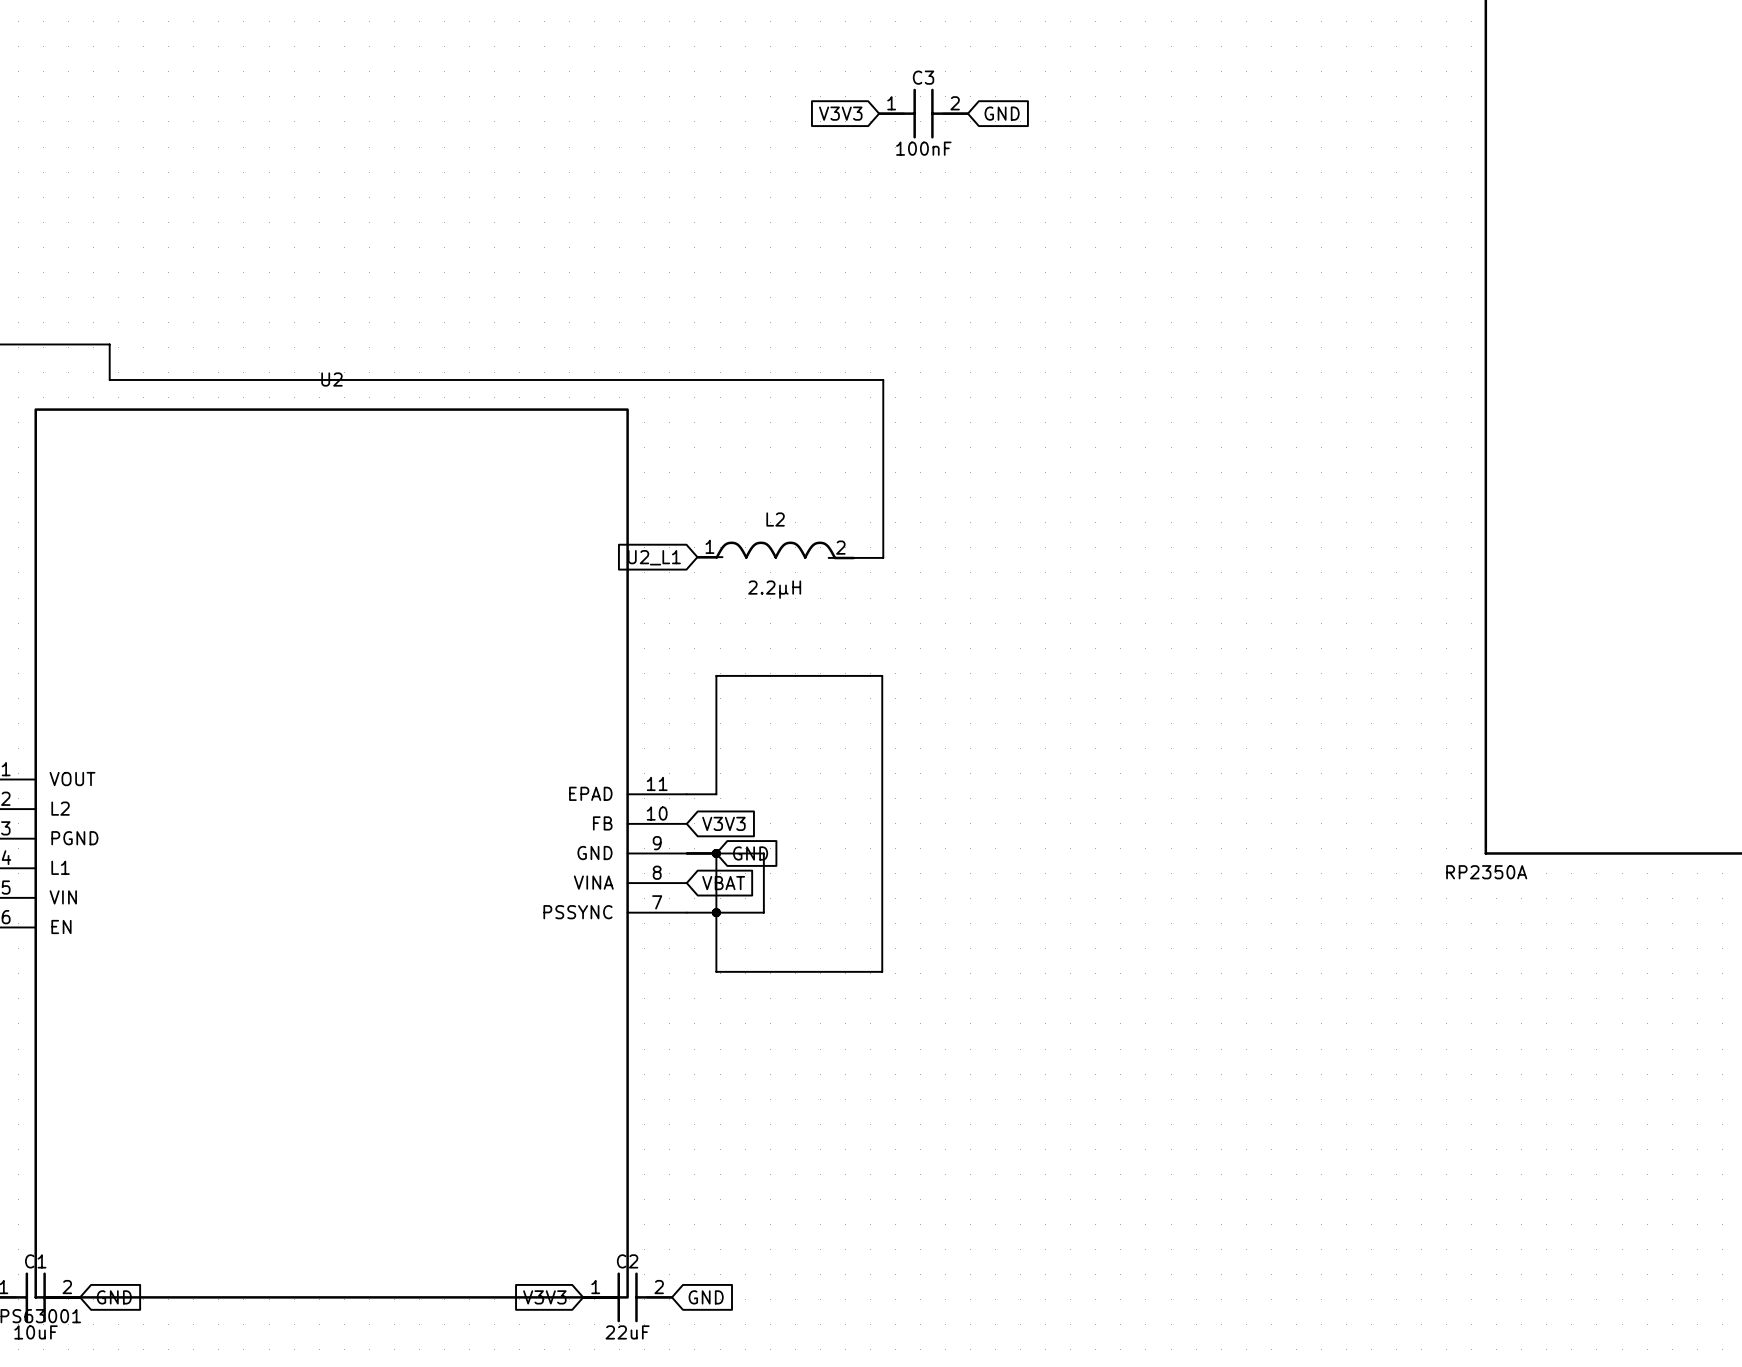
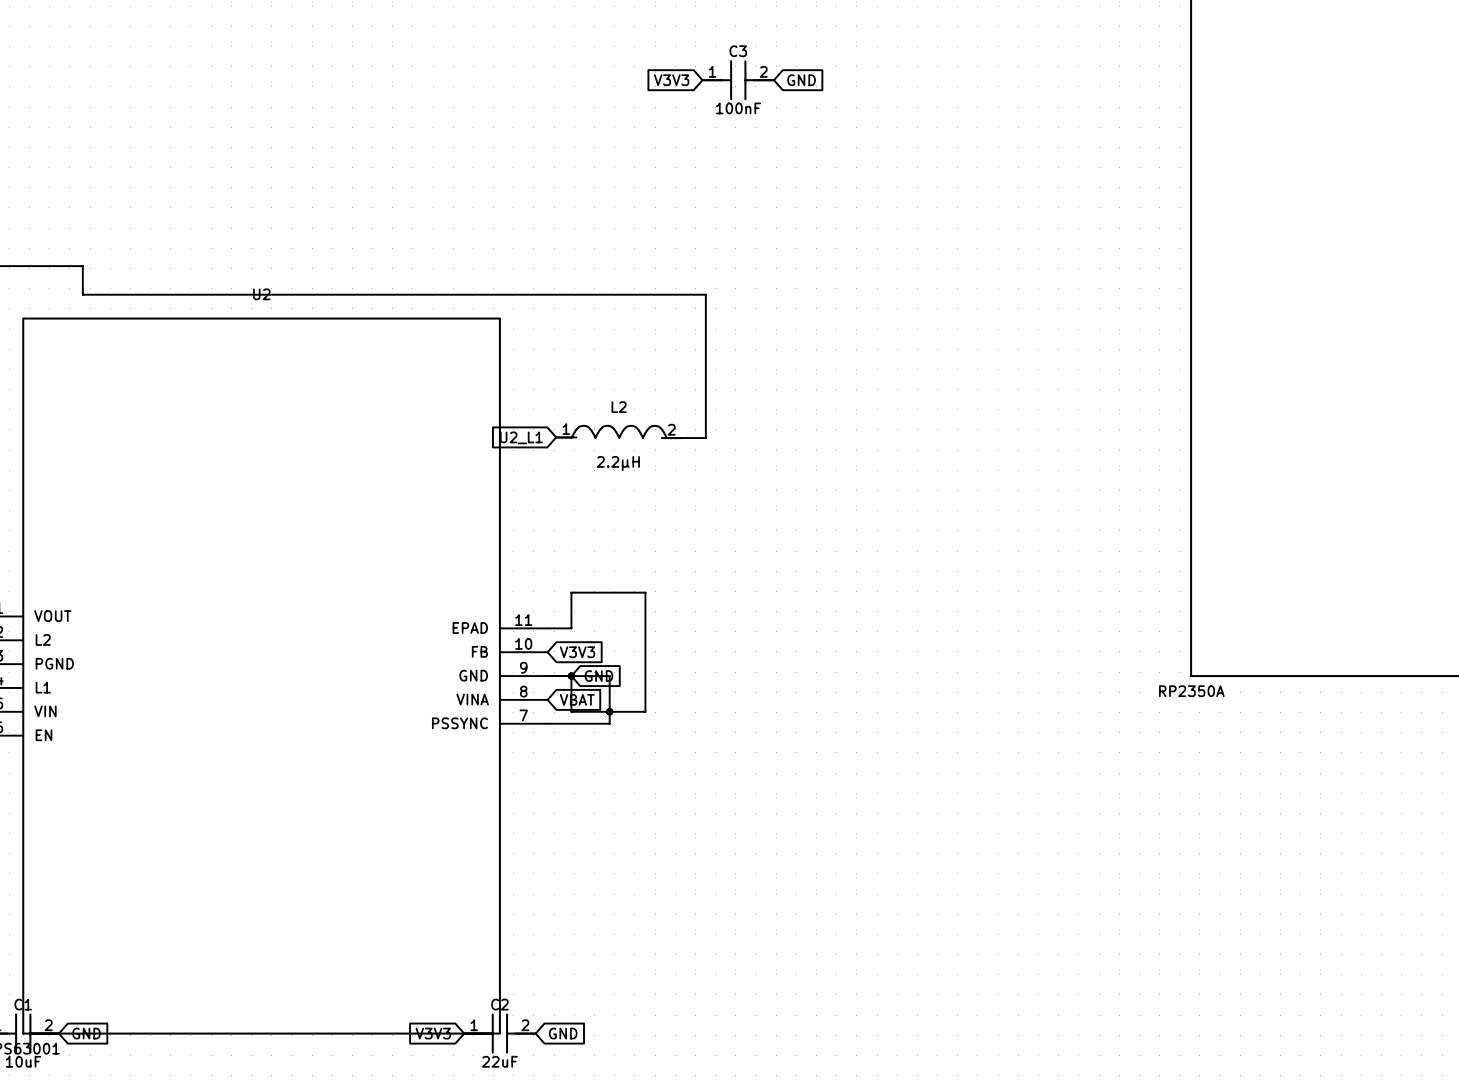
wire: (716, 749) (716, 675) (882, 675) (882, 971) (716, 971) (716, 897) -> (571, 592) (645, 592) (645, 711) (571, 711)
junction: none -> (609, 711)
junction: (716, 912) -> none

